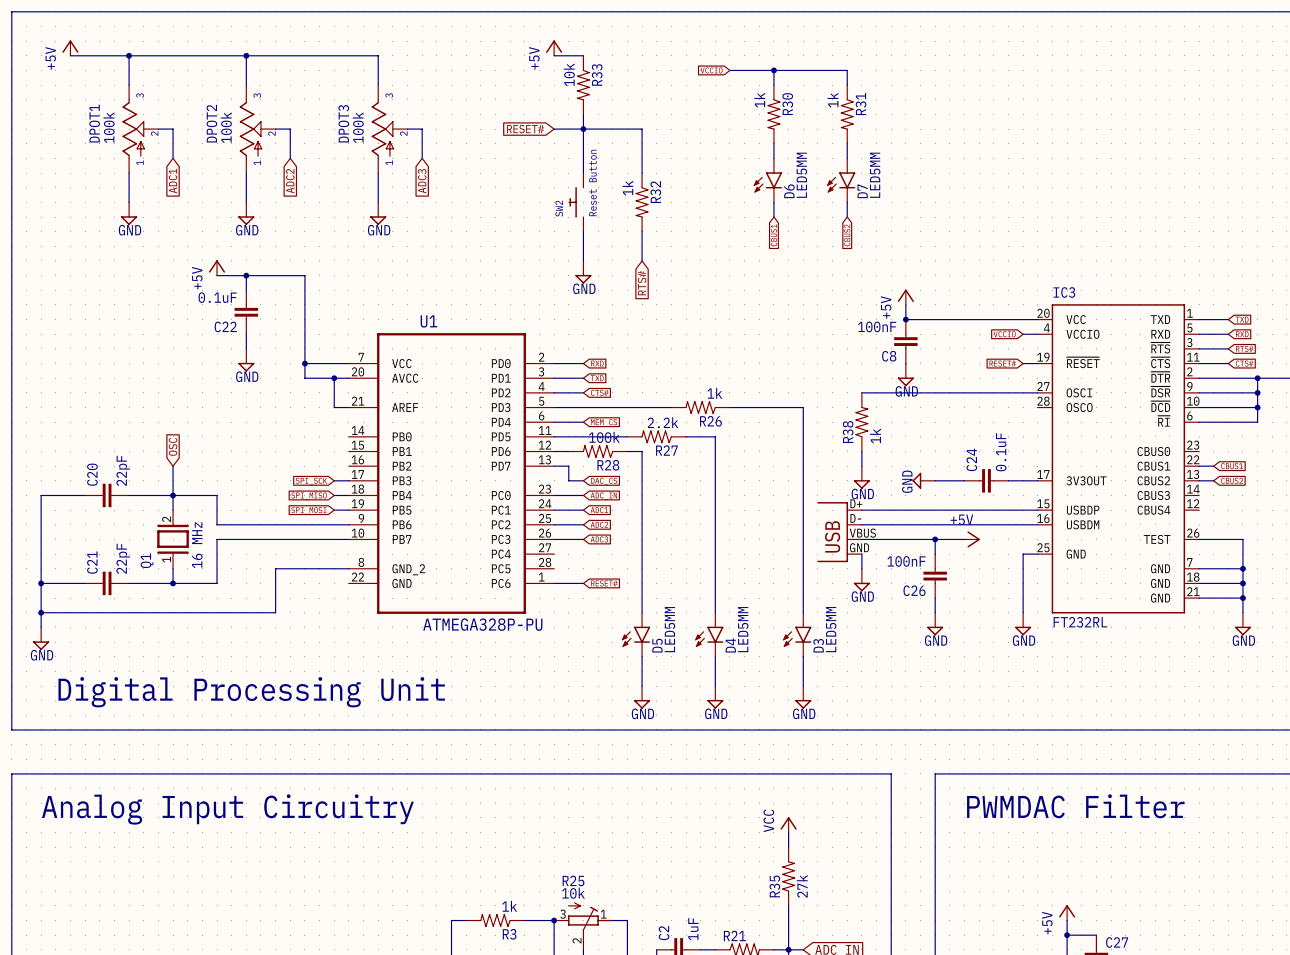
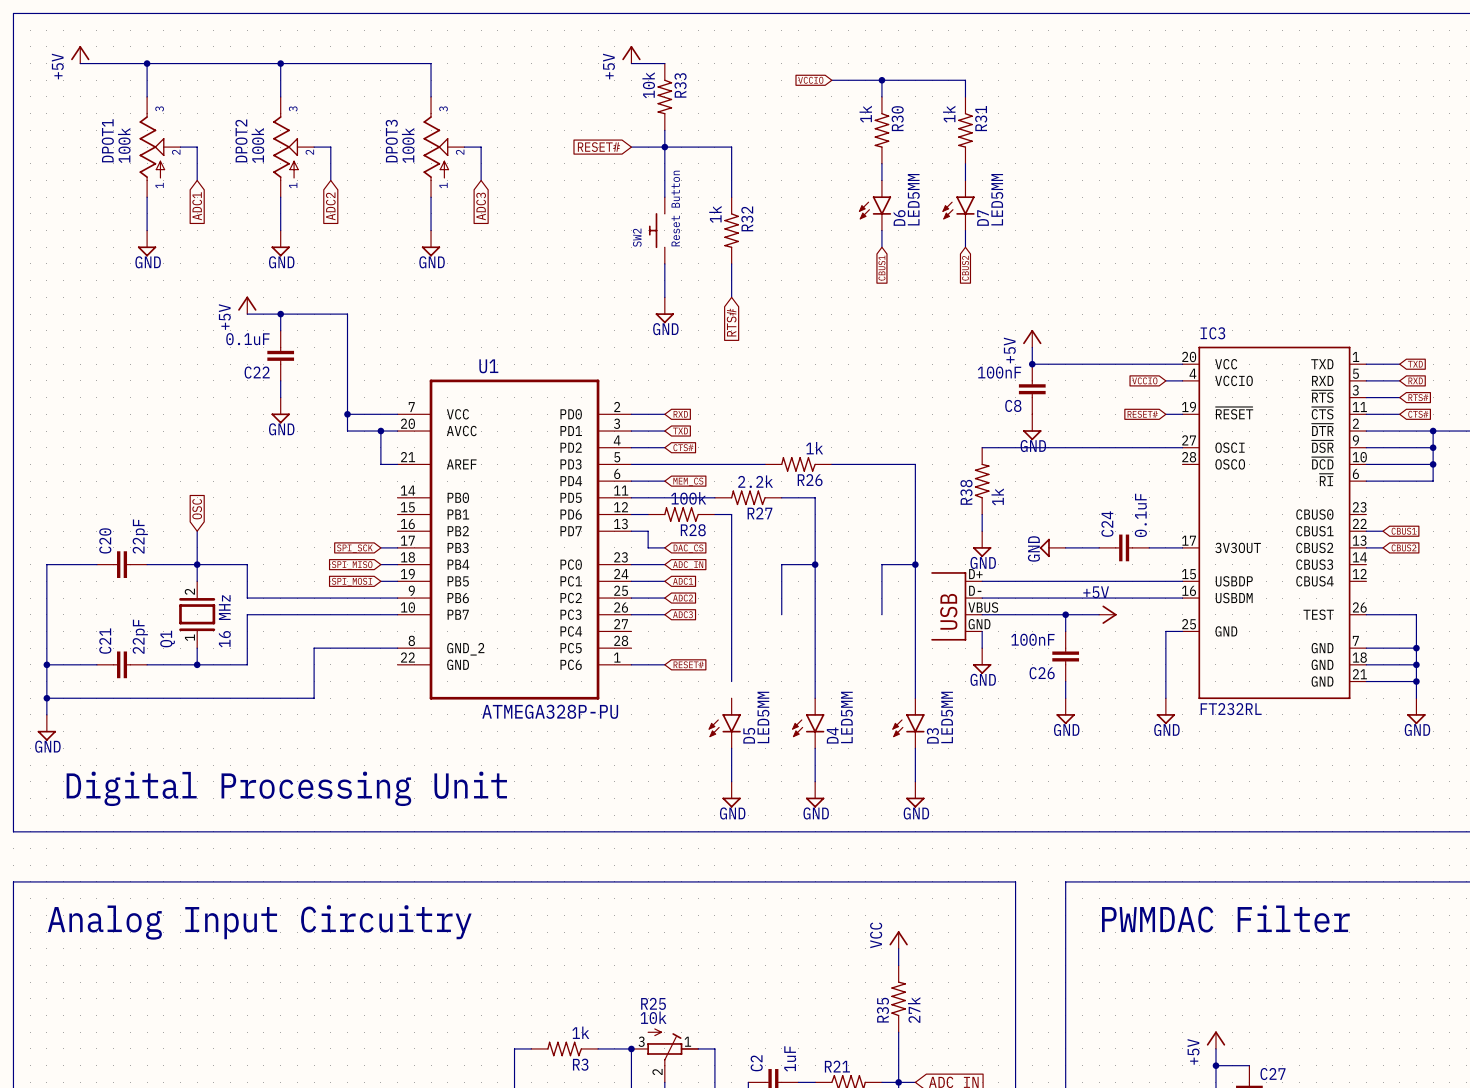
wire: none -> (815, 564) (781, 564) (781, 614)
junction: none -> (815, 564)
wire: none -> (915, 564) (881, 564) (881, 614)
junction: none -> (915, 564)
wire: (642, 598) (642, 612) -> none

